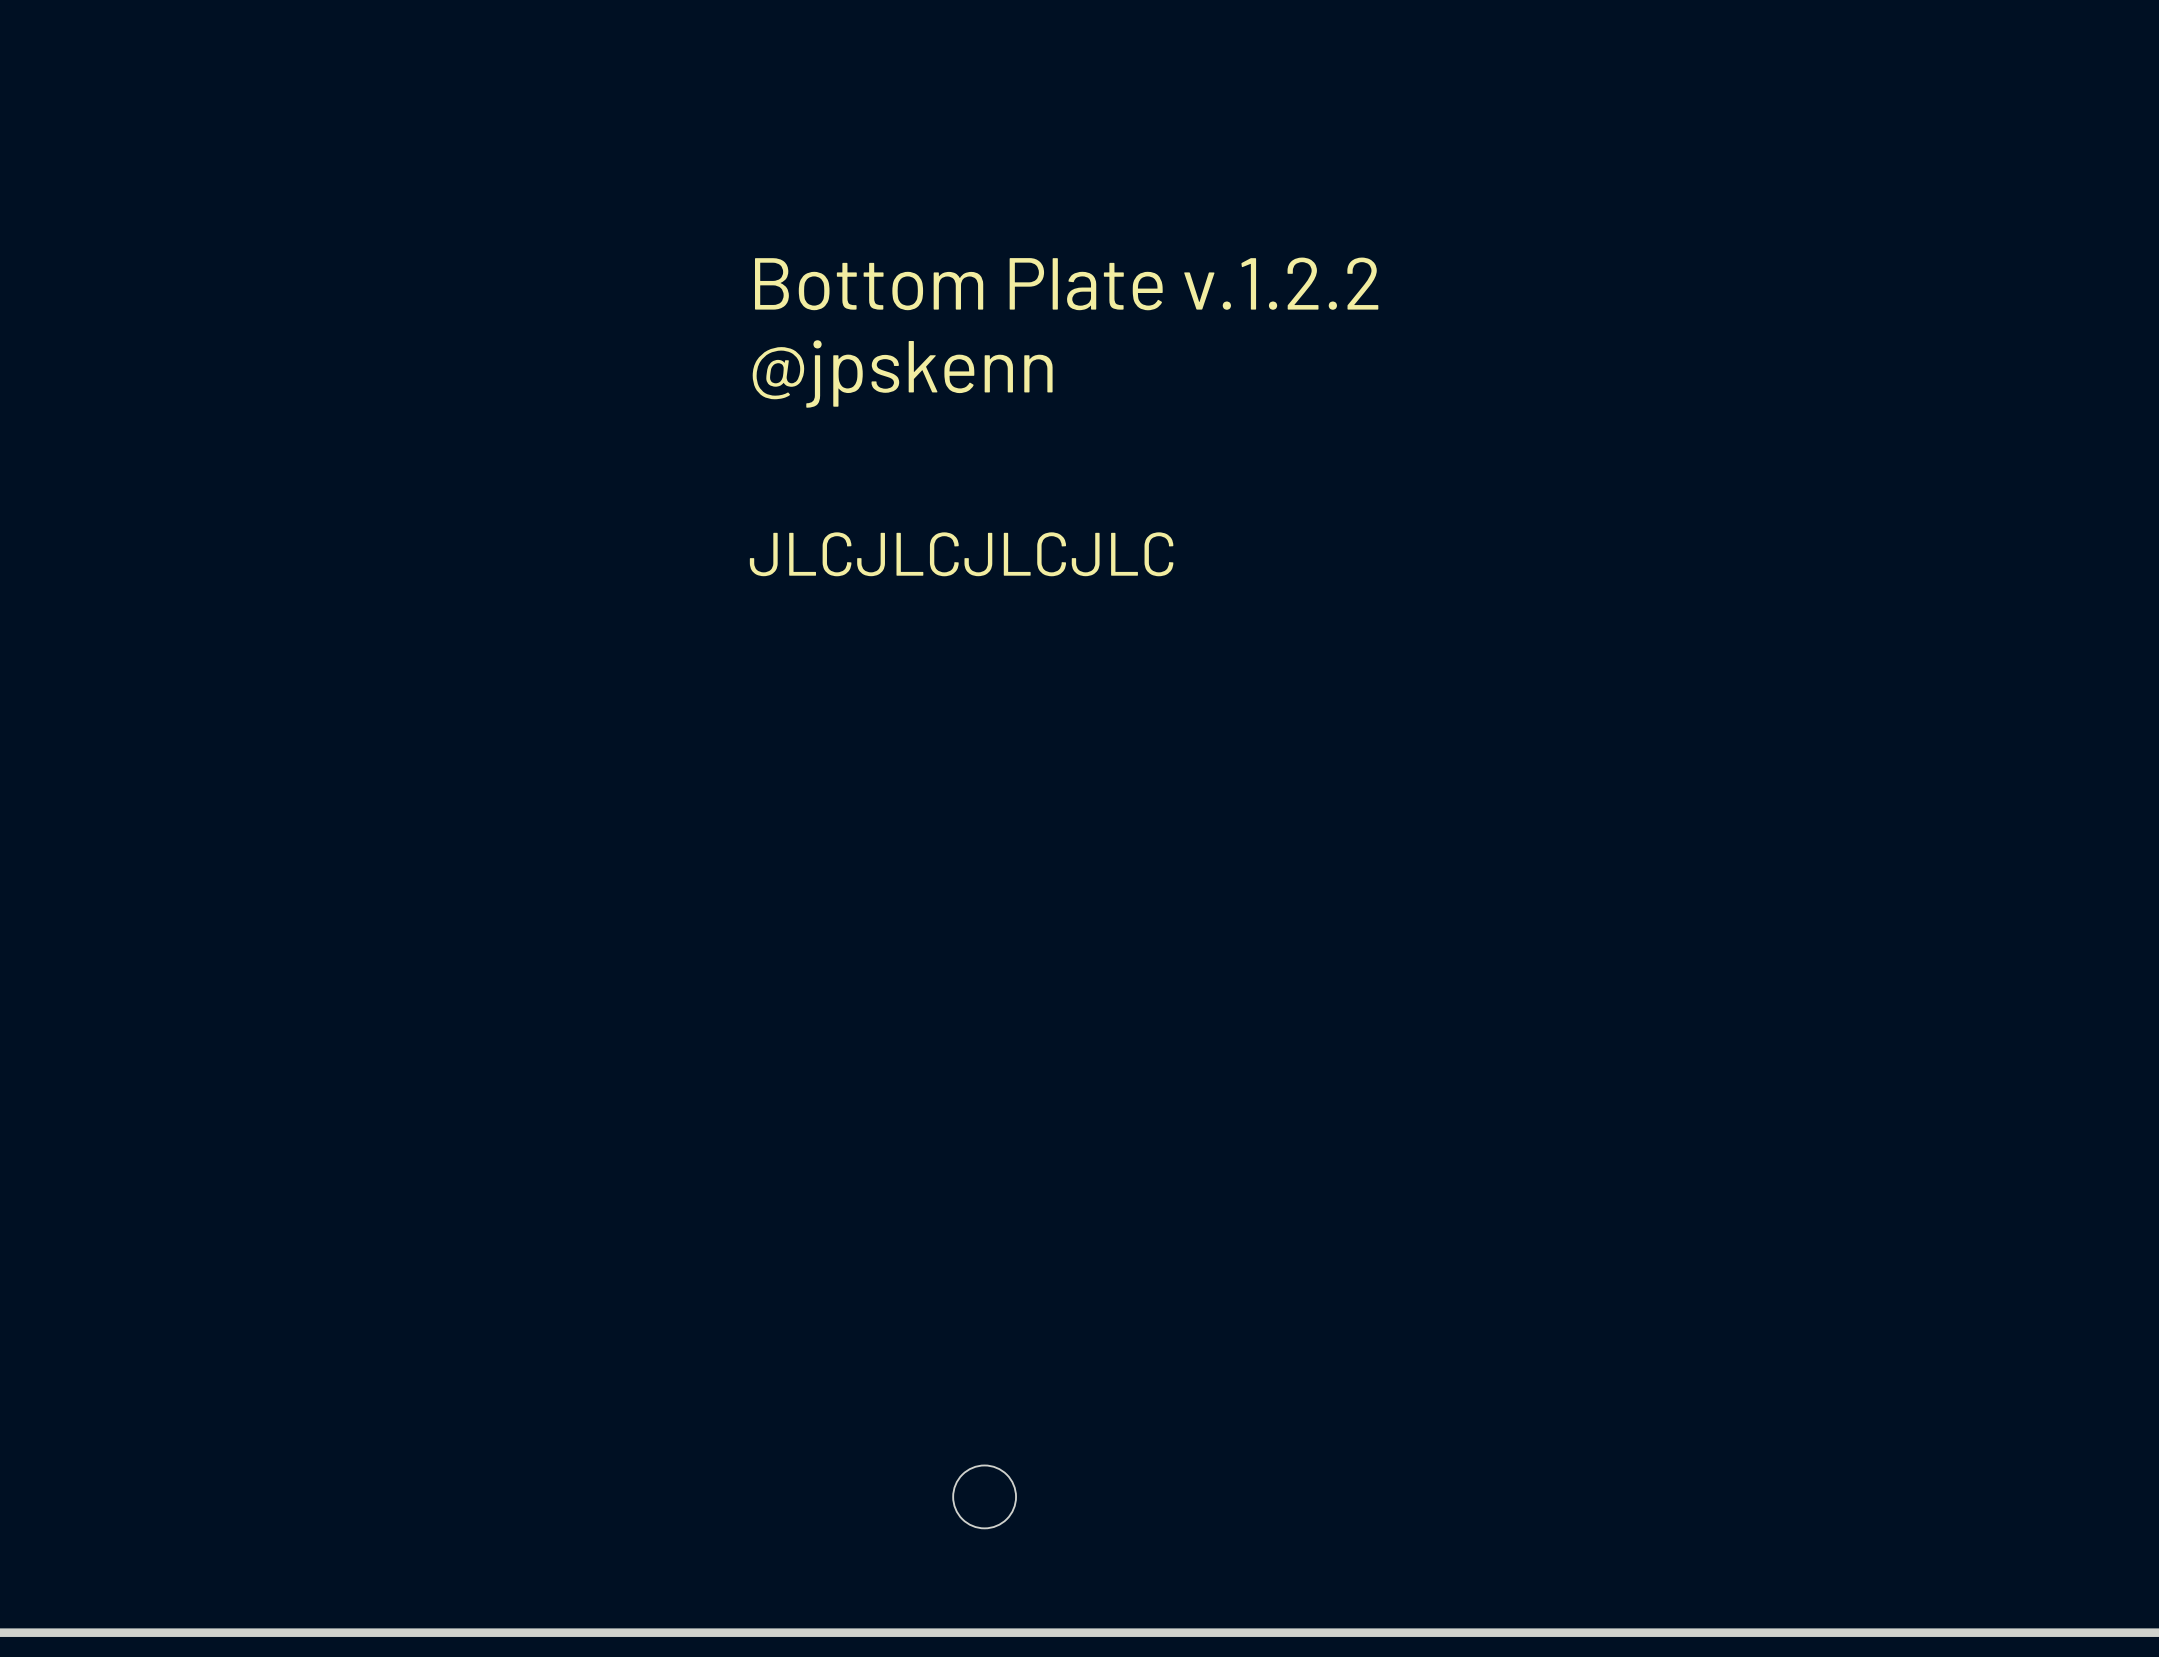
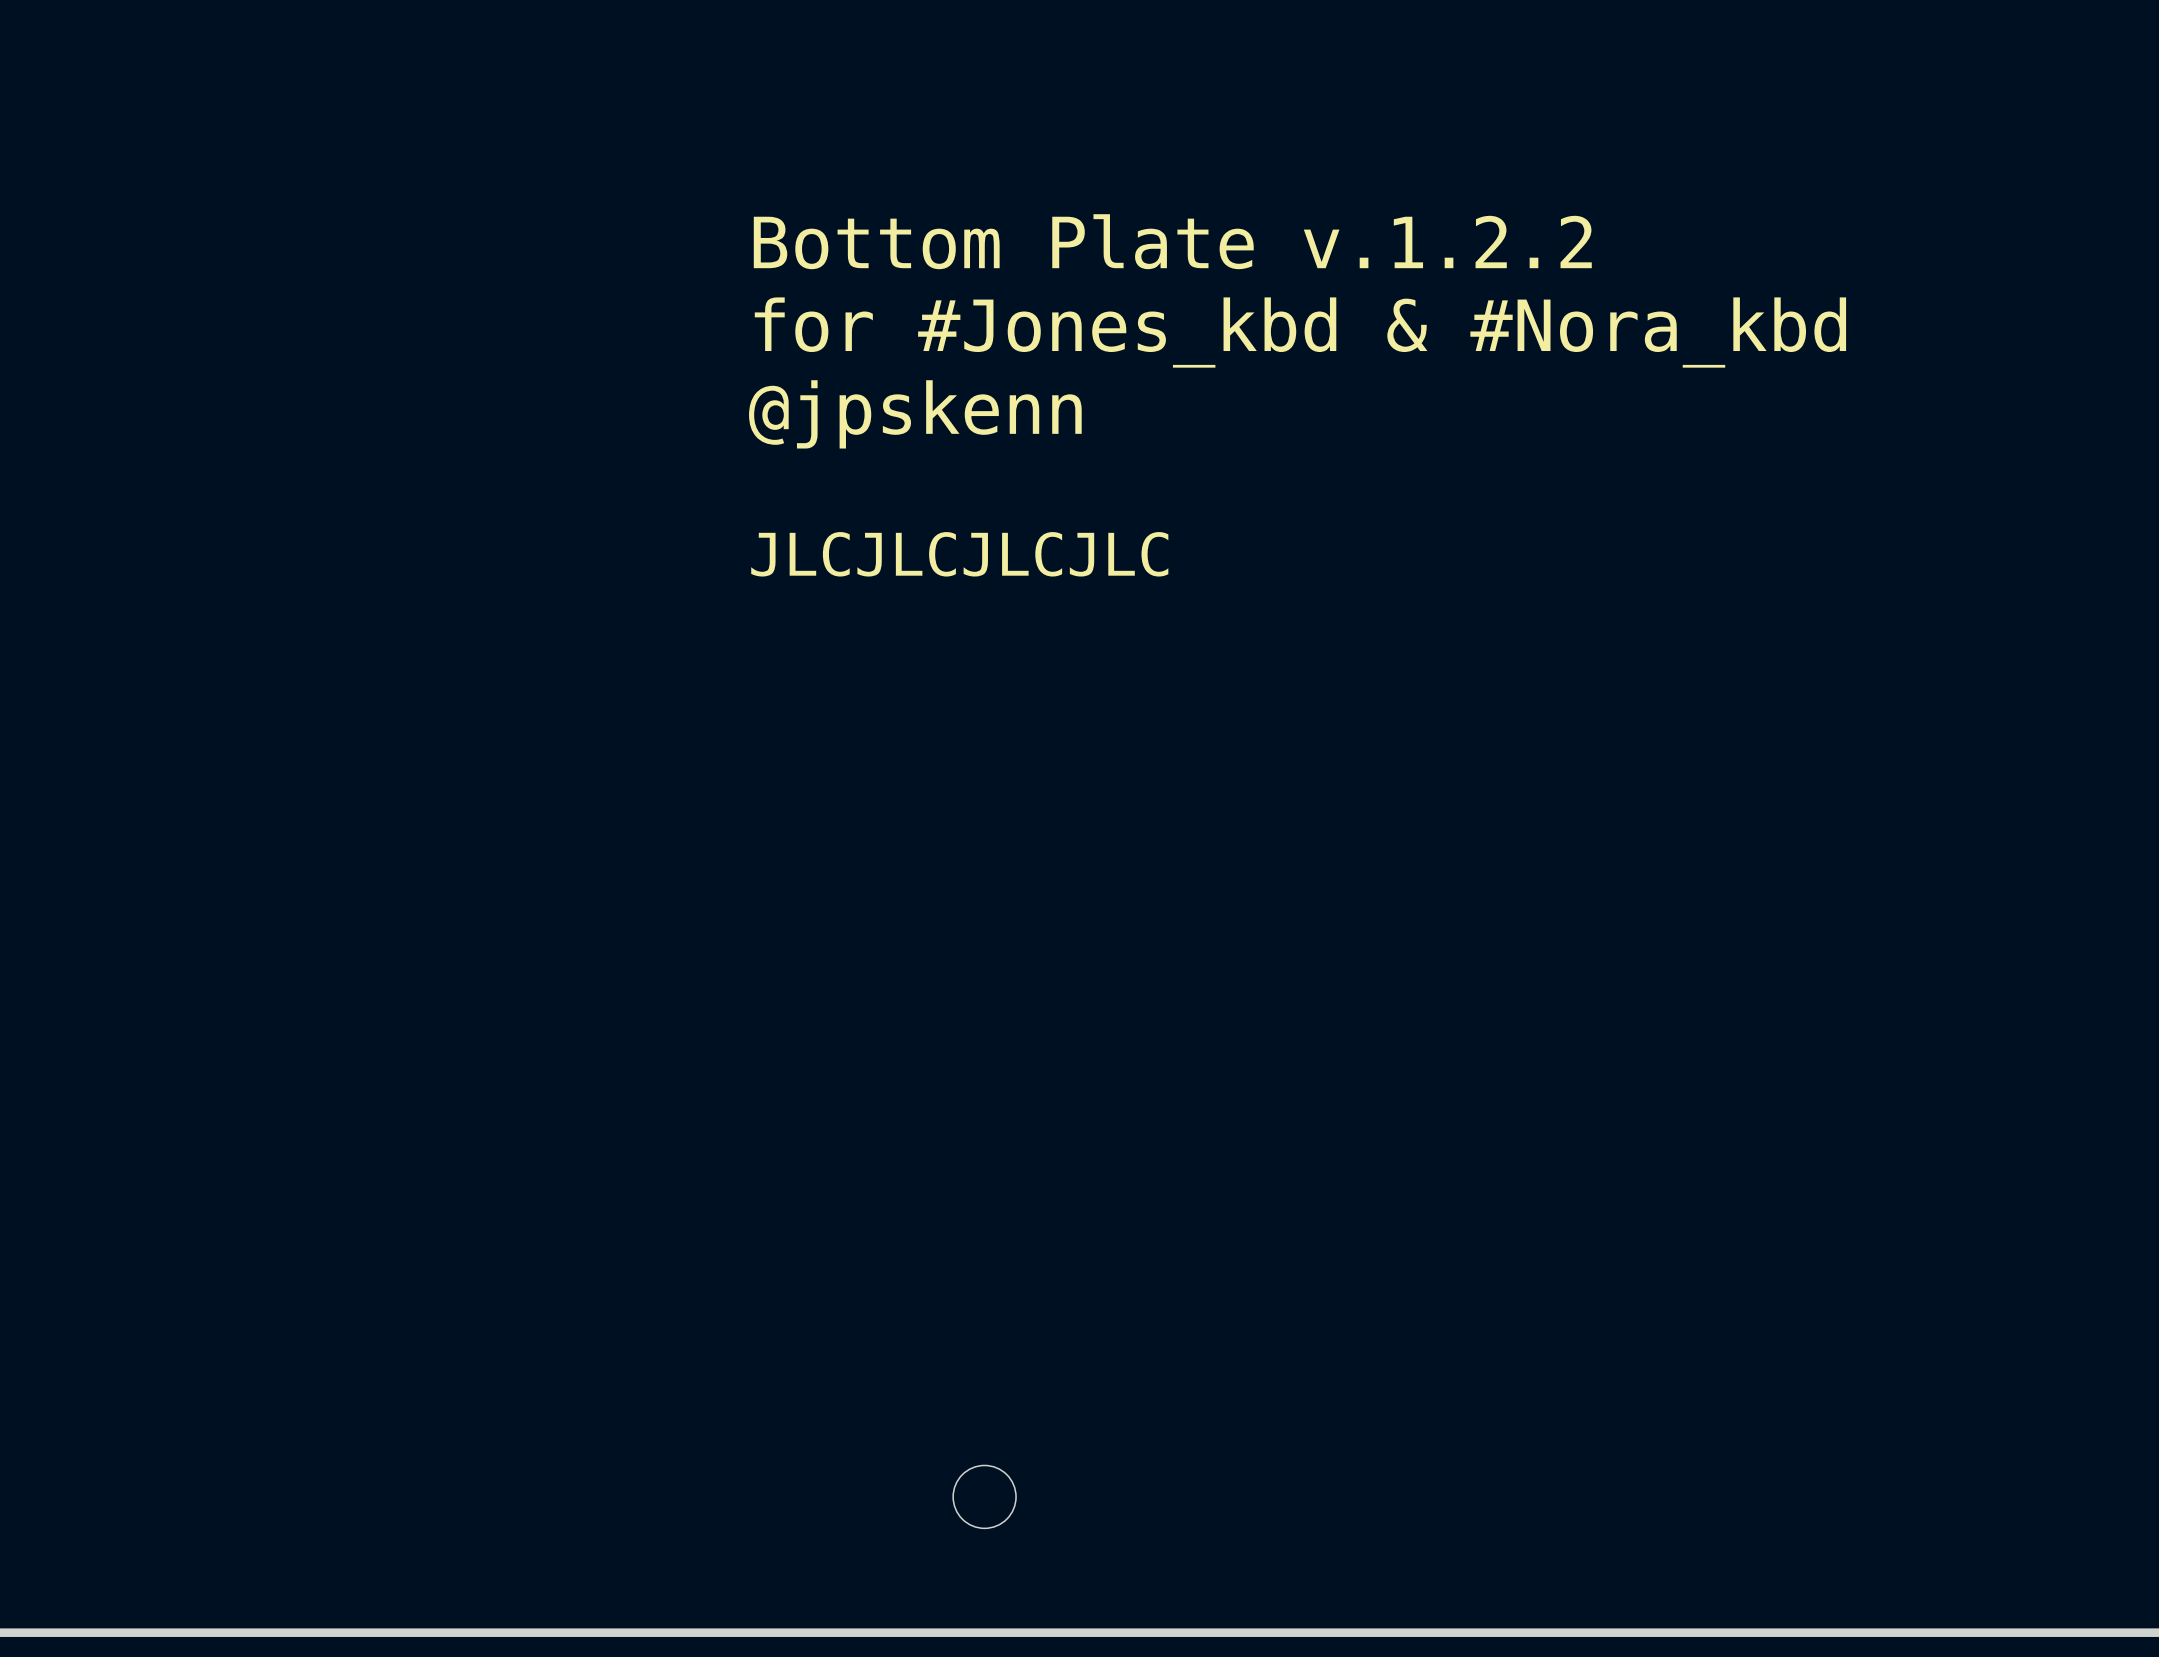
text position: Bottom Plate v.1.2.2 (1066, 283) -> Bottom Plate v.1.2.2 (1172, 241)
text: none -> for #Jones_kbd & #Nora_kbd (1300, 332)
text position: @jpskenn (902, 373) -> @jpskenn (915, 414)

